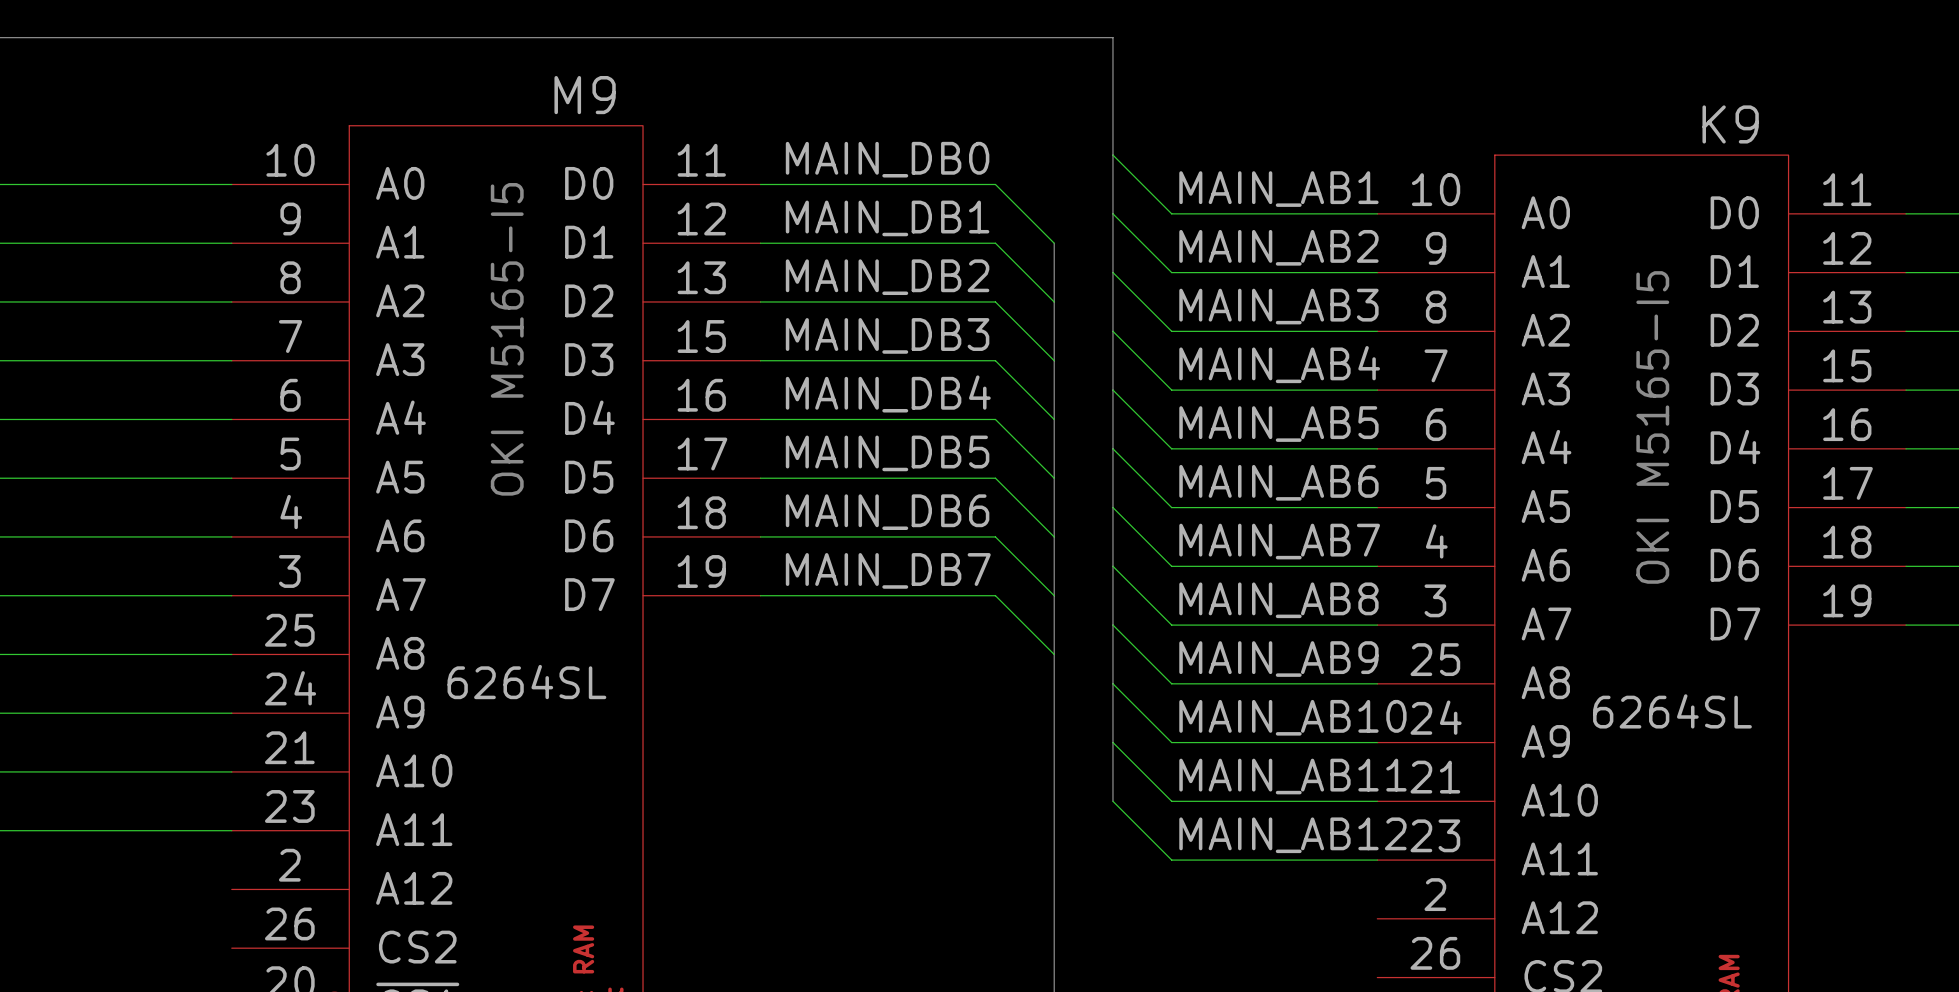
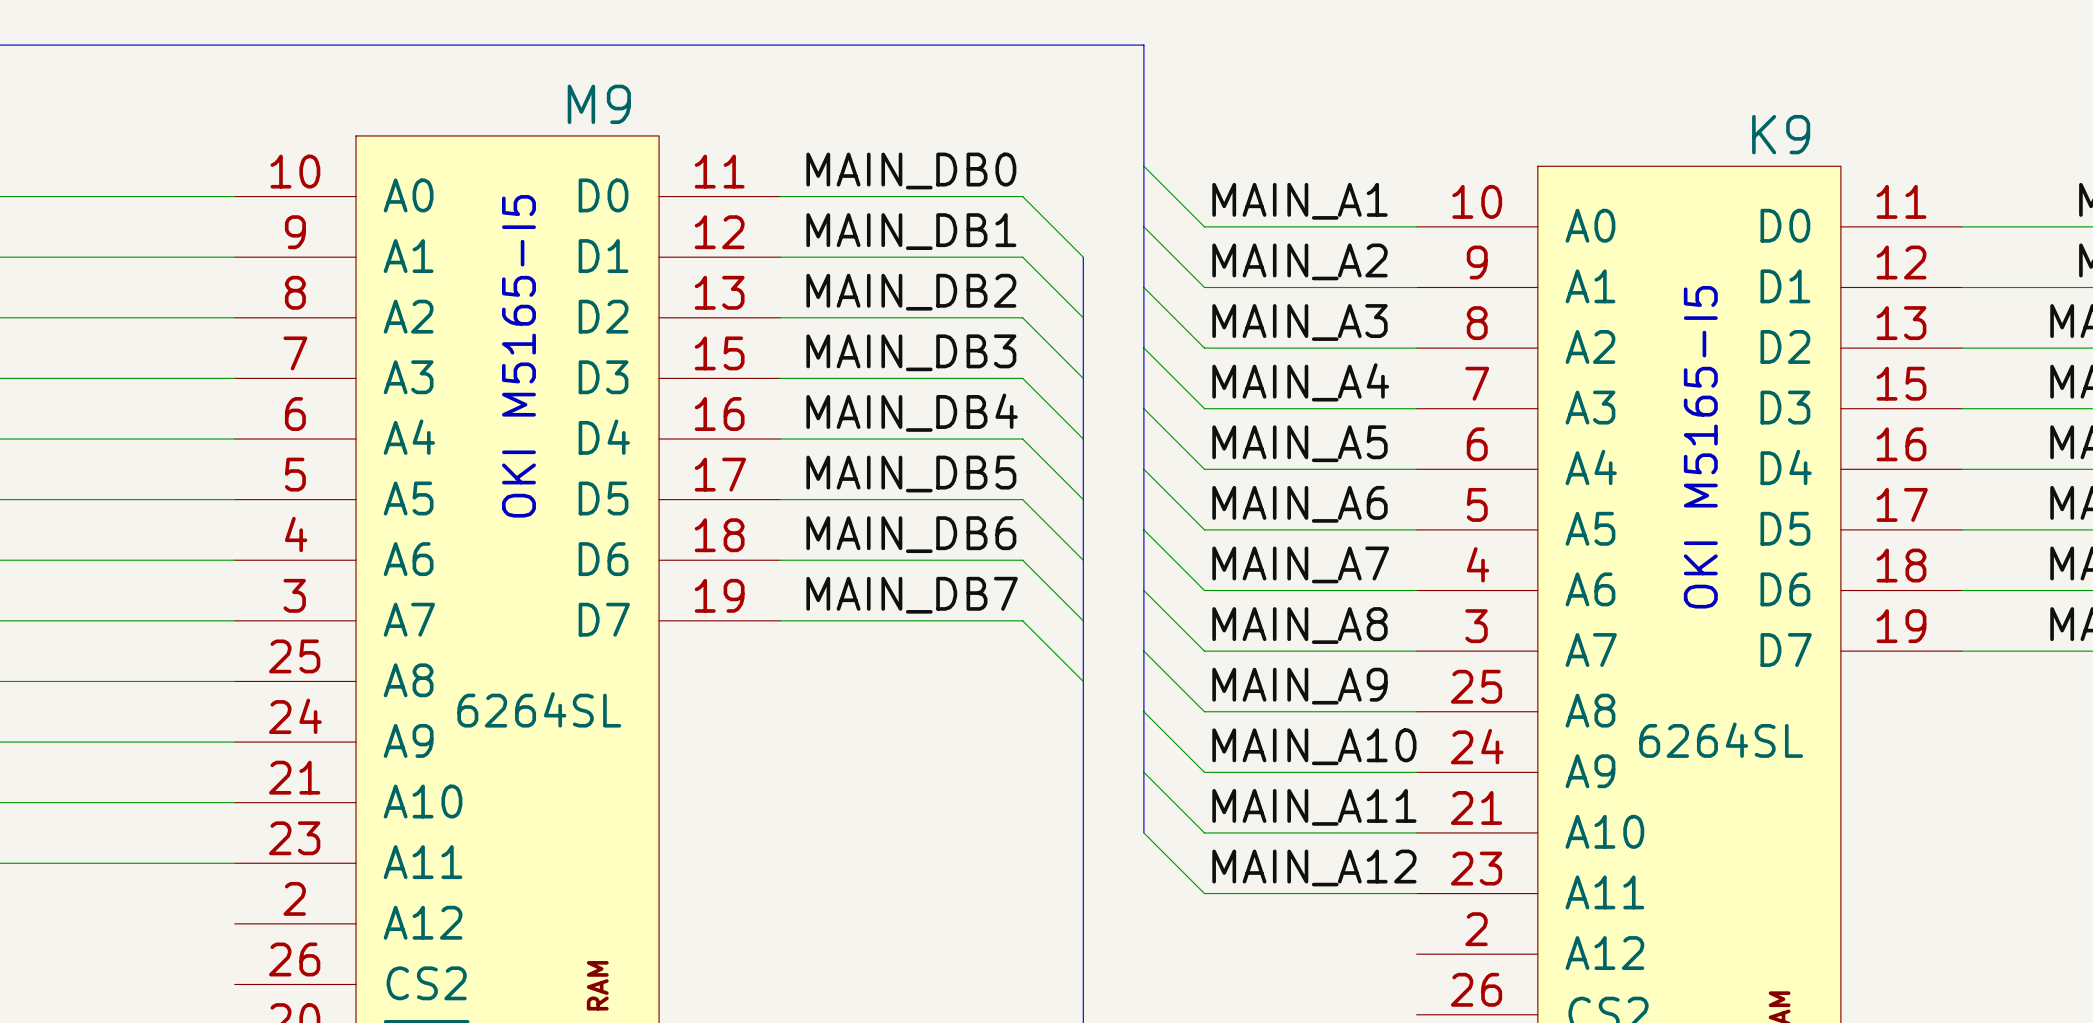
label: MAIN_AB1 (1278, 189) -> MAIN_A1 (1299, 201)
label: MAIN_AB2 (1278, 247) -> MAIN_A2 (1299, 261)
label: MAIN_AB3 (1278, 306) -> MAIN_A3 (1299, 322)
label: MAIN_AB4 (1279, 364) -> MAIN_A4 (1300, 382)
label: MAIN_AB5 (1278, 424) -> MAIN_A5 (1299, 443)
label: MAIN_AB6 (1278, 482) -> MAIN_A6 (1299, 504)
label: MAIN_AB7 (1279, 541) -> MAIN_A7 (1300, 564)
label: MAIN_AB8 (1278, 600) -> MAIN_A8 (1299, 625)
label: MAIN_AB9 (1278, 659) -> MAIN_A9 (1299, 686)
label: MAIN_AB10 (1292, 717) -> MAIN_A10 (1314, 746)
label: MAIN_AB11 (1292, 776) -> MAIN_A11 (1314, 807)
label: MAIN_AB12 (1292, 835) -> MAIN_A12 (1314, 867)

